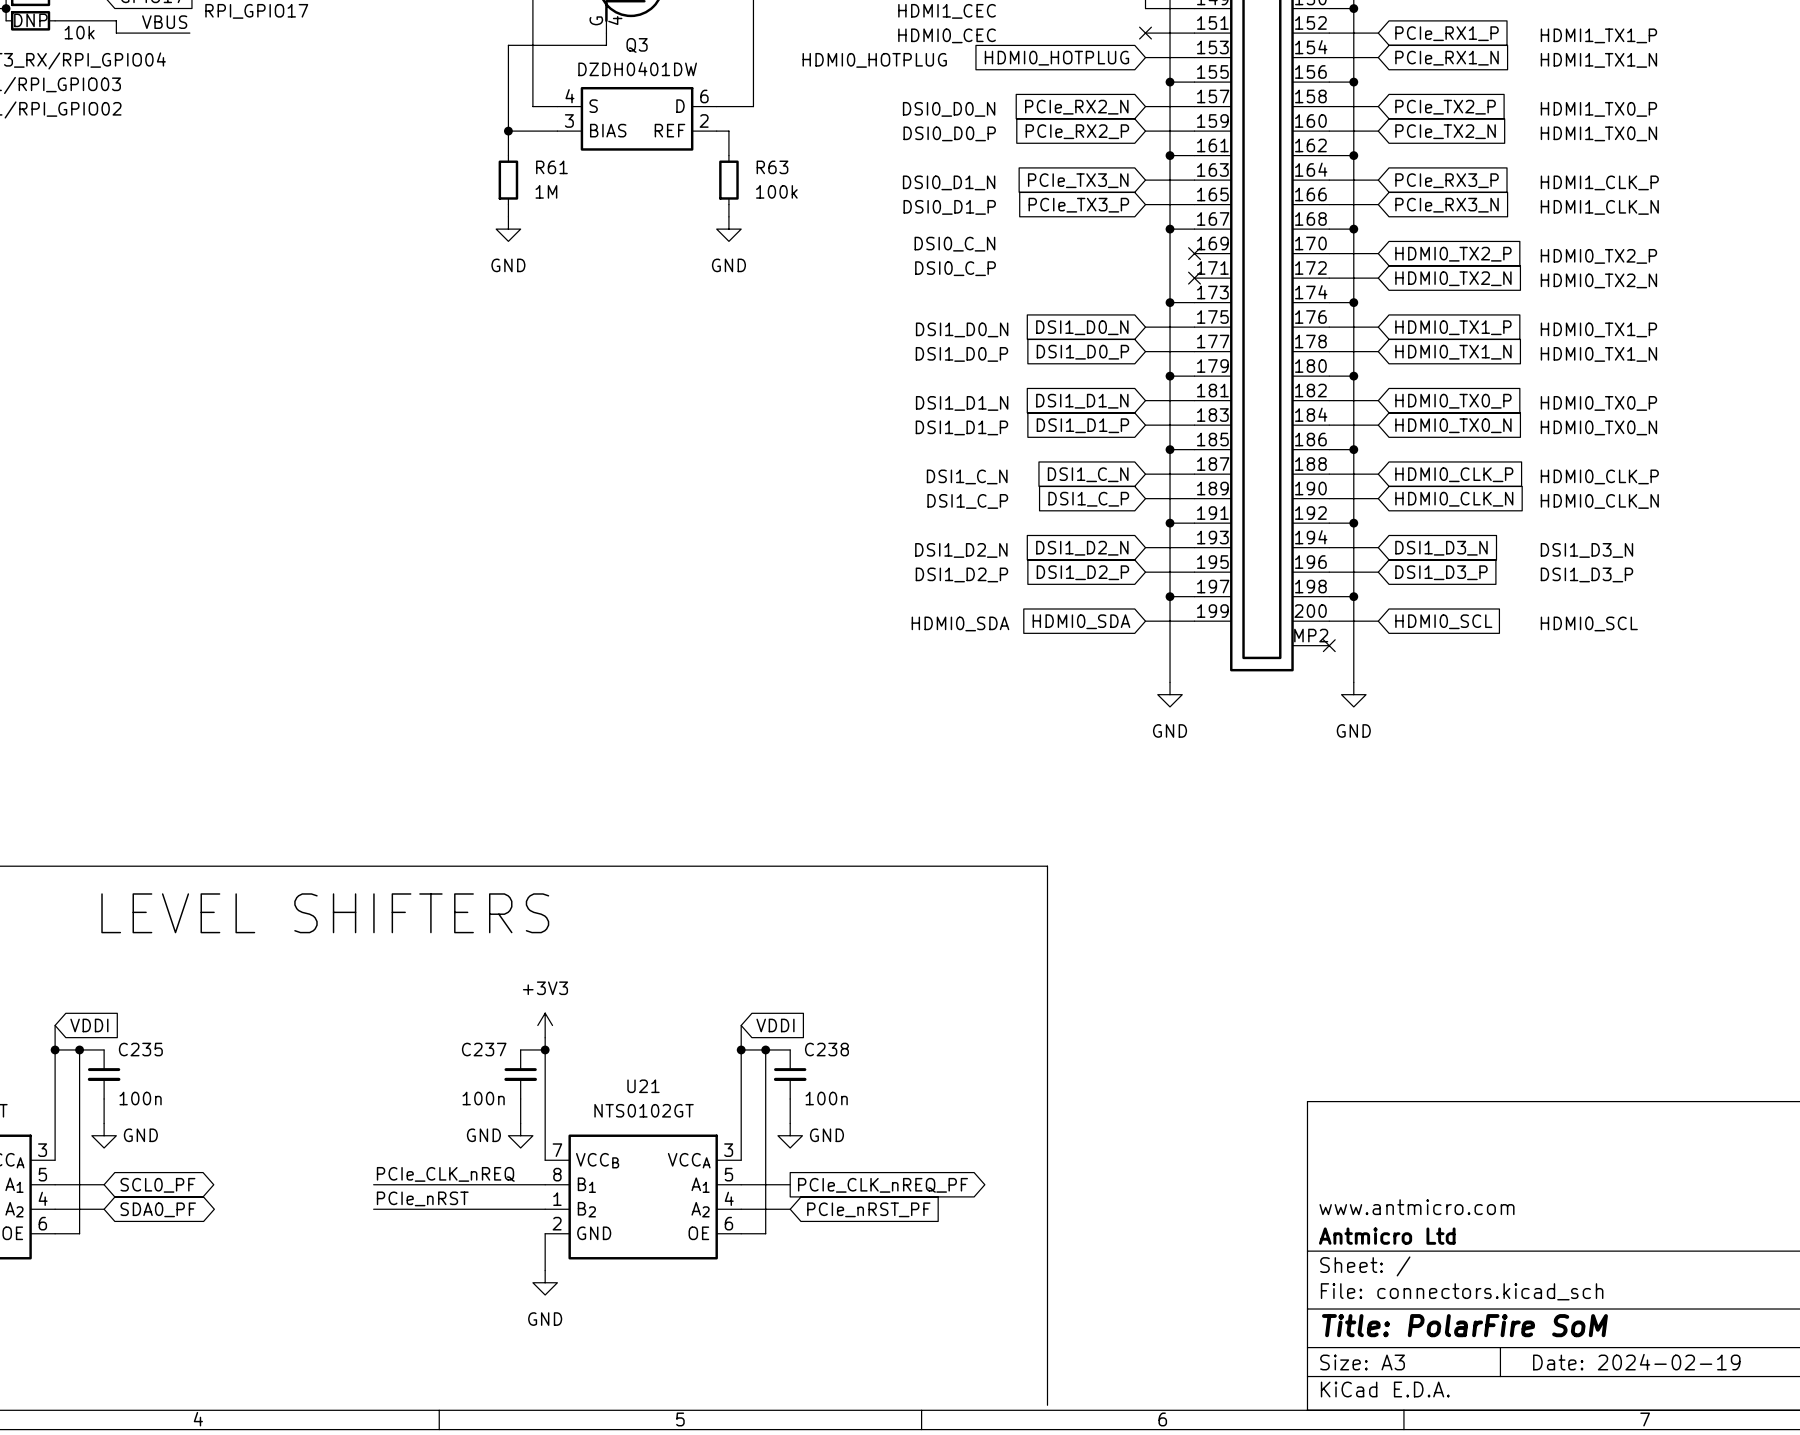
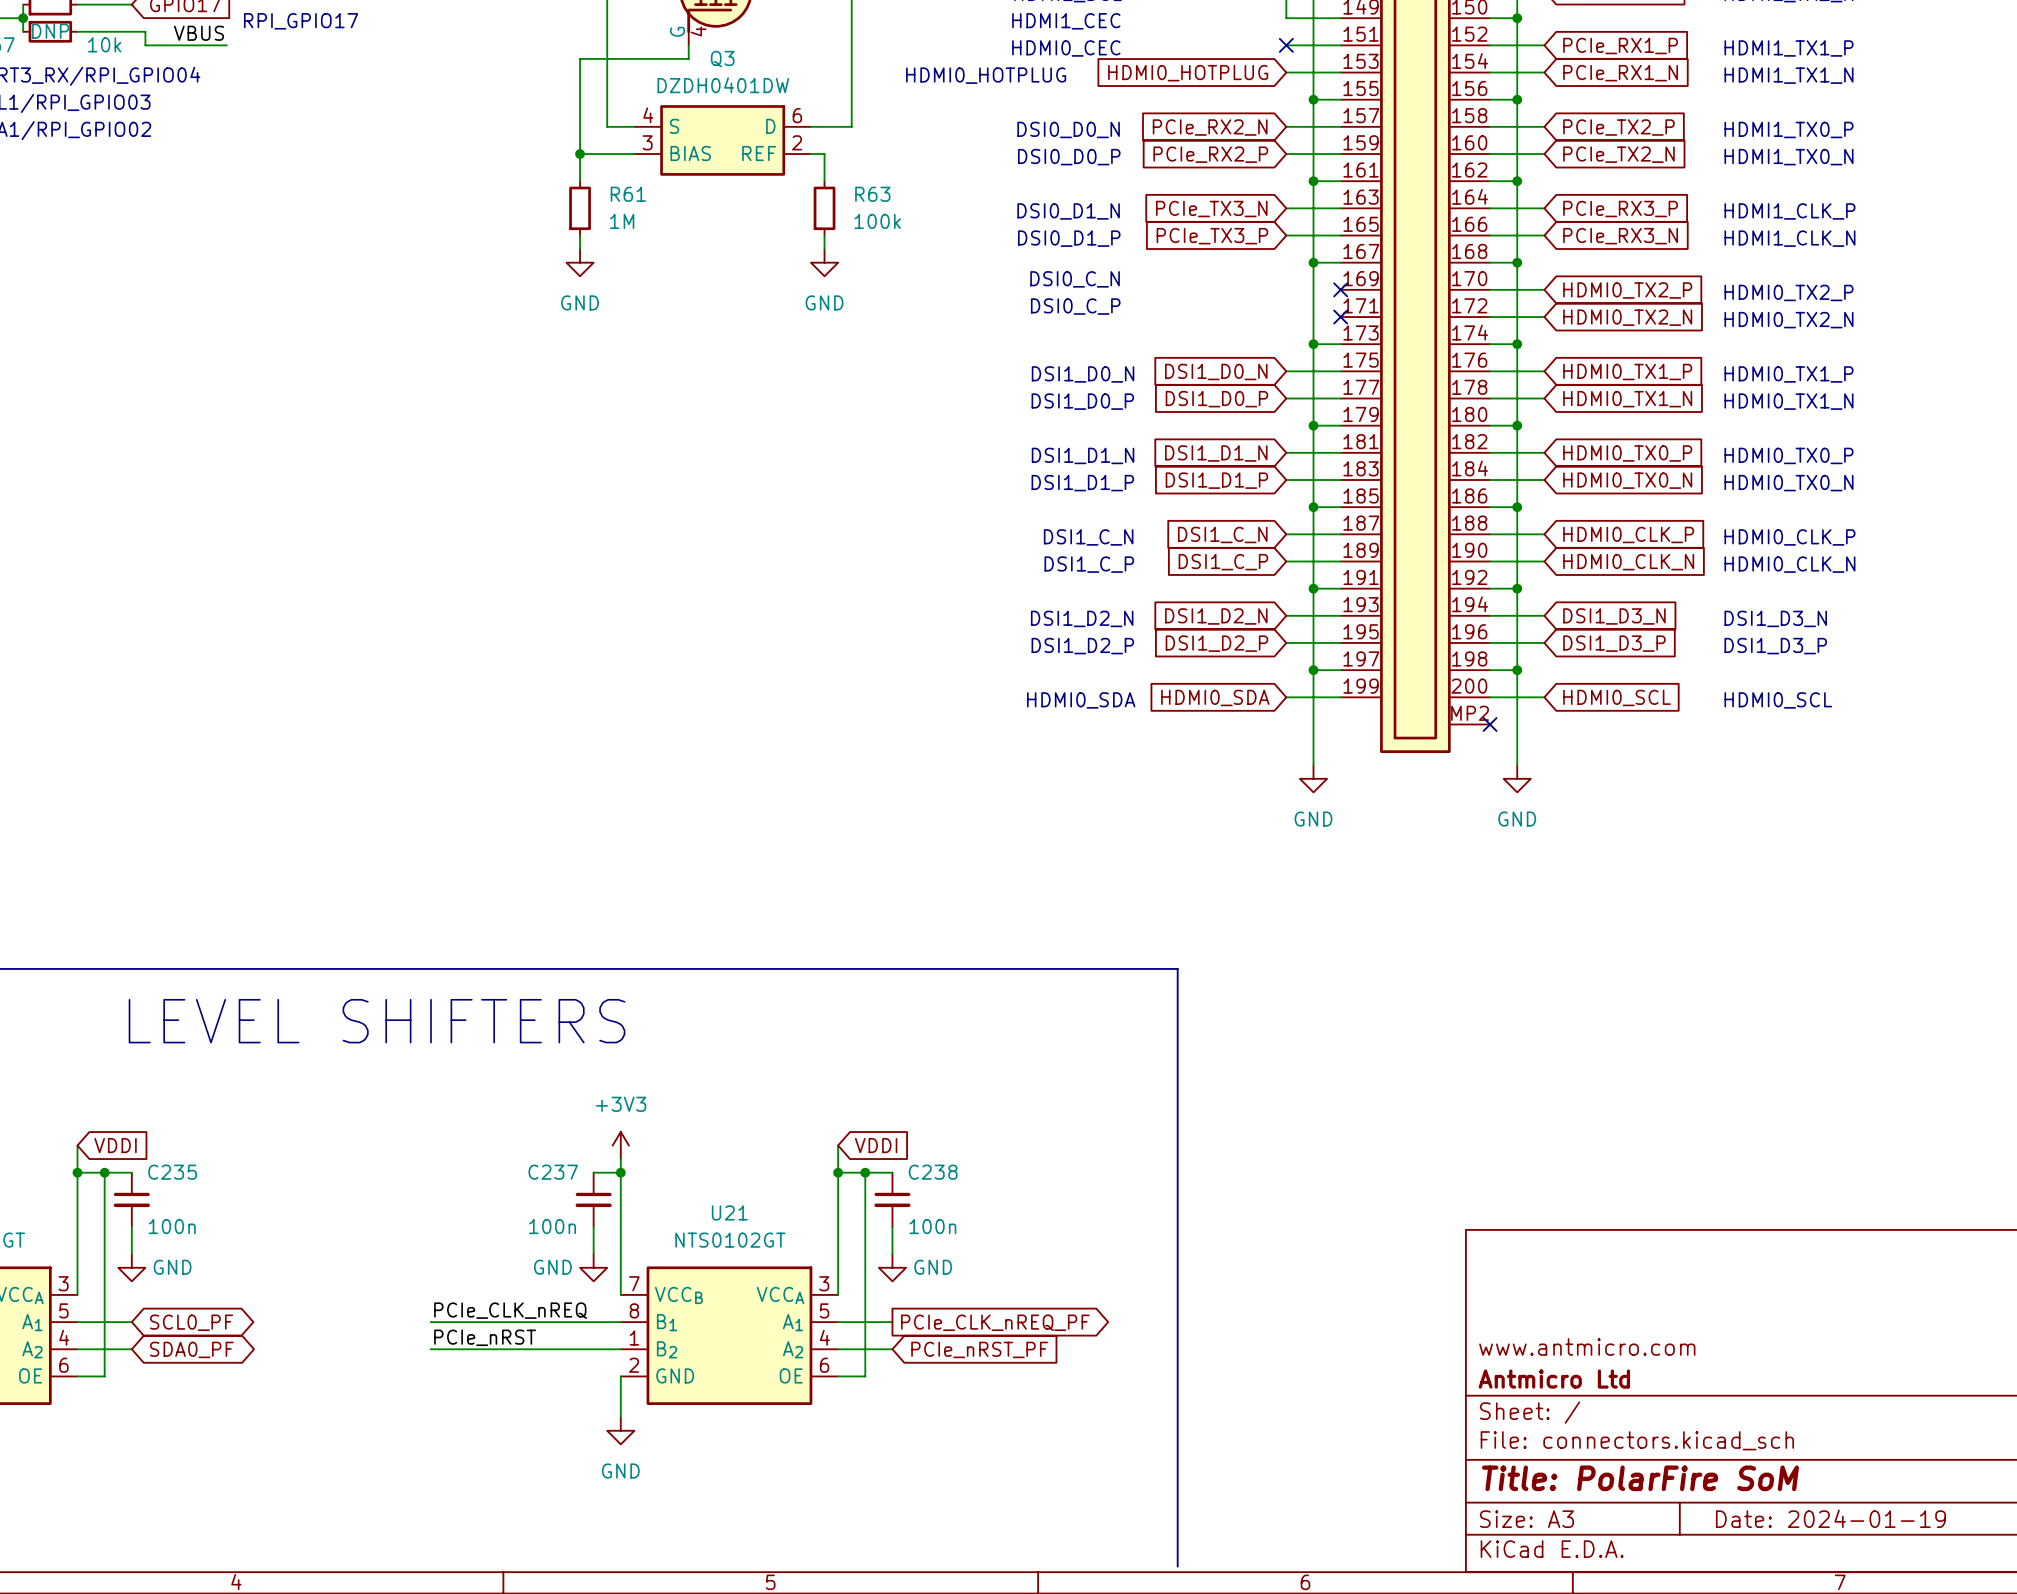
title block: Date: 2024-02-19 (1636, 1362) -> Date: 2024-01-19 (1830, 1518)

